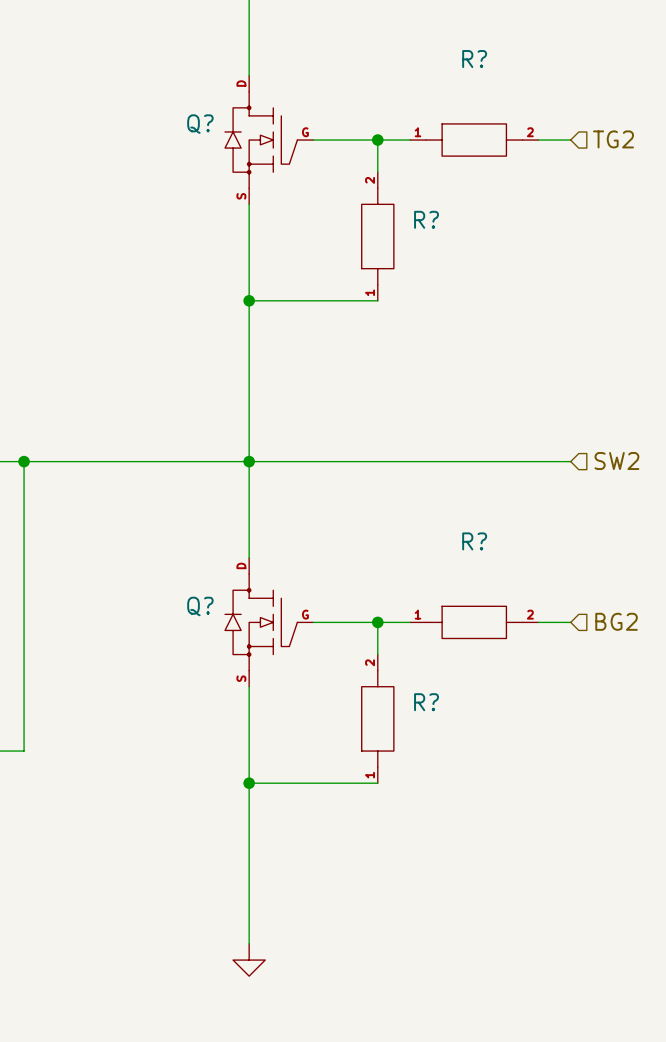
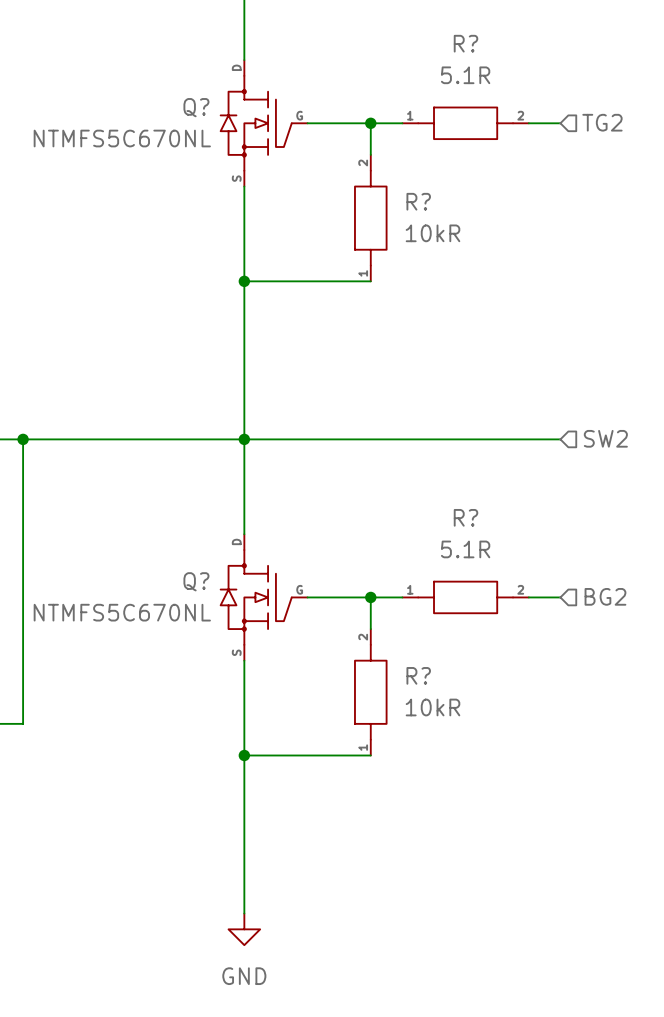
R? value: none -> 5.1R (465, 75)
Q? value: none -> NTMFS5C670NL (122, 138)
R? value: none -> 10kR (432, 233)
R? value: none -> 5.1R (465, 549)
Q? value: none -> NTMFS5C670NL (122, 612)
R? value: none -> 10kR (432, 707)
power symbol text: none -> GND (244, 976)

